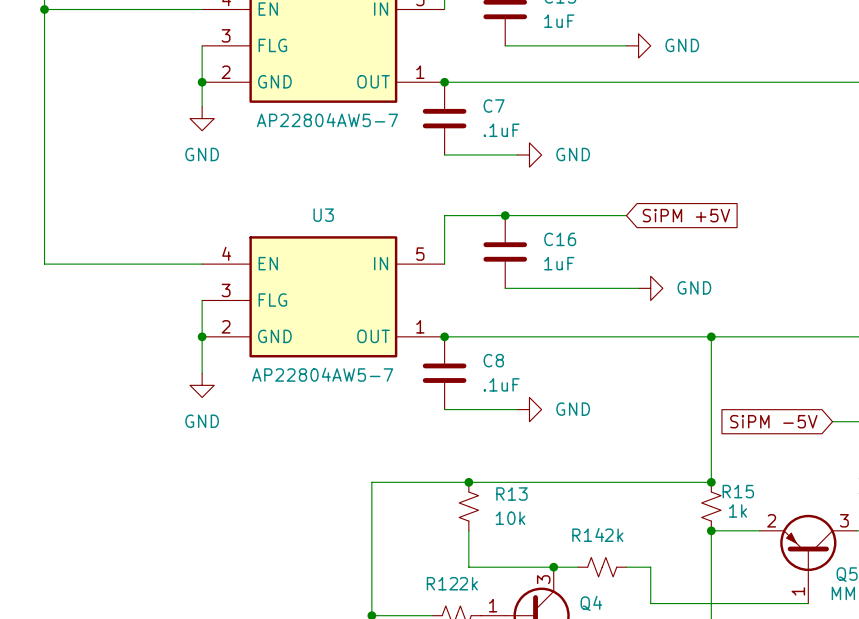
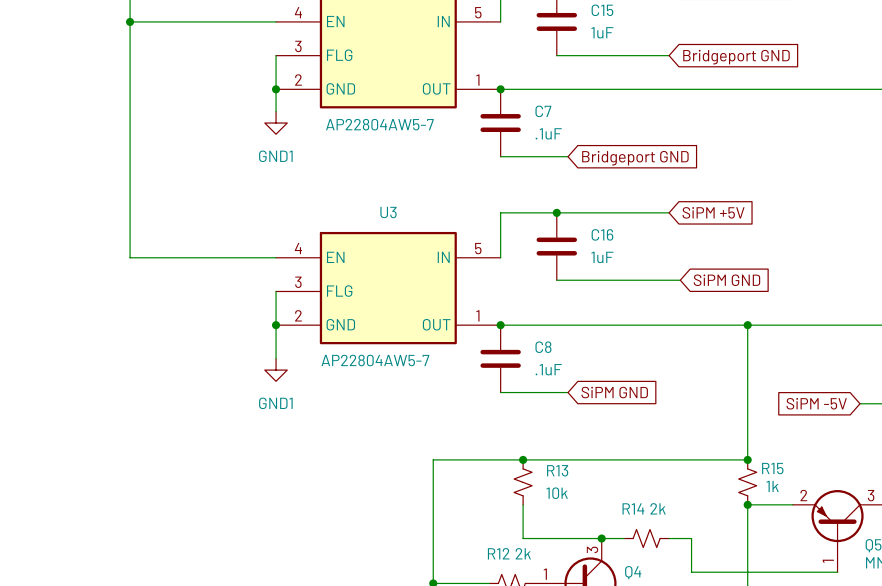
power symbol: GND (638, 45) -> none
global label: none -> Bridgeport GND (736, 57)
power symbol: GND (202, 118) -> GND1 (276, 123)
power symbol: GND (529, 154) -> none
global label: none -> Bridgeport GND (635, 158)
power symbol: GND (650, 288) -> none
global label: none -> SiPM GND (726, 280)
power symbol: GND (202, 385) -> GND1 (276, 370)
power symbol: GND (529, 409) -> none
global label: none -> SiPM GND (614, 392)

